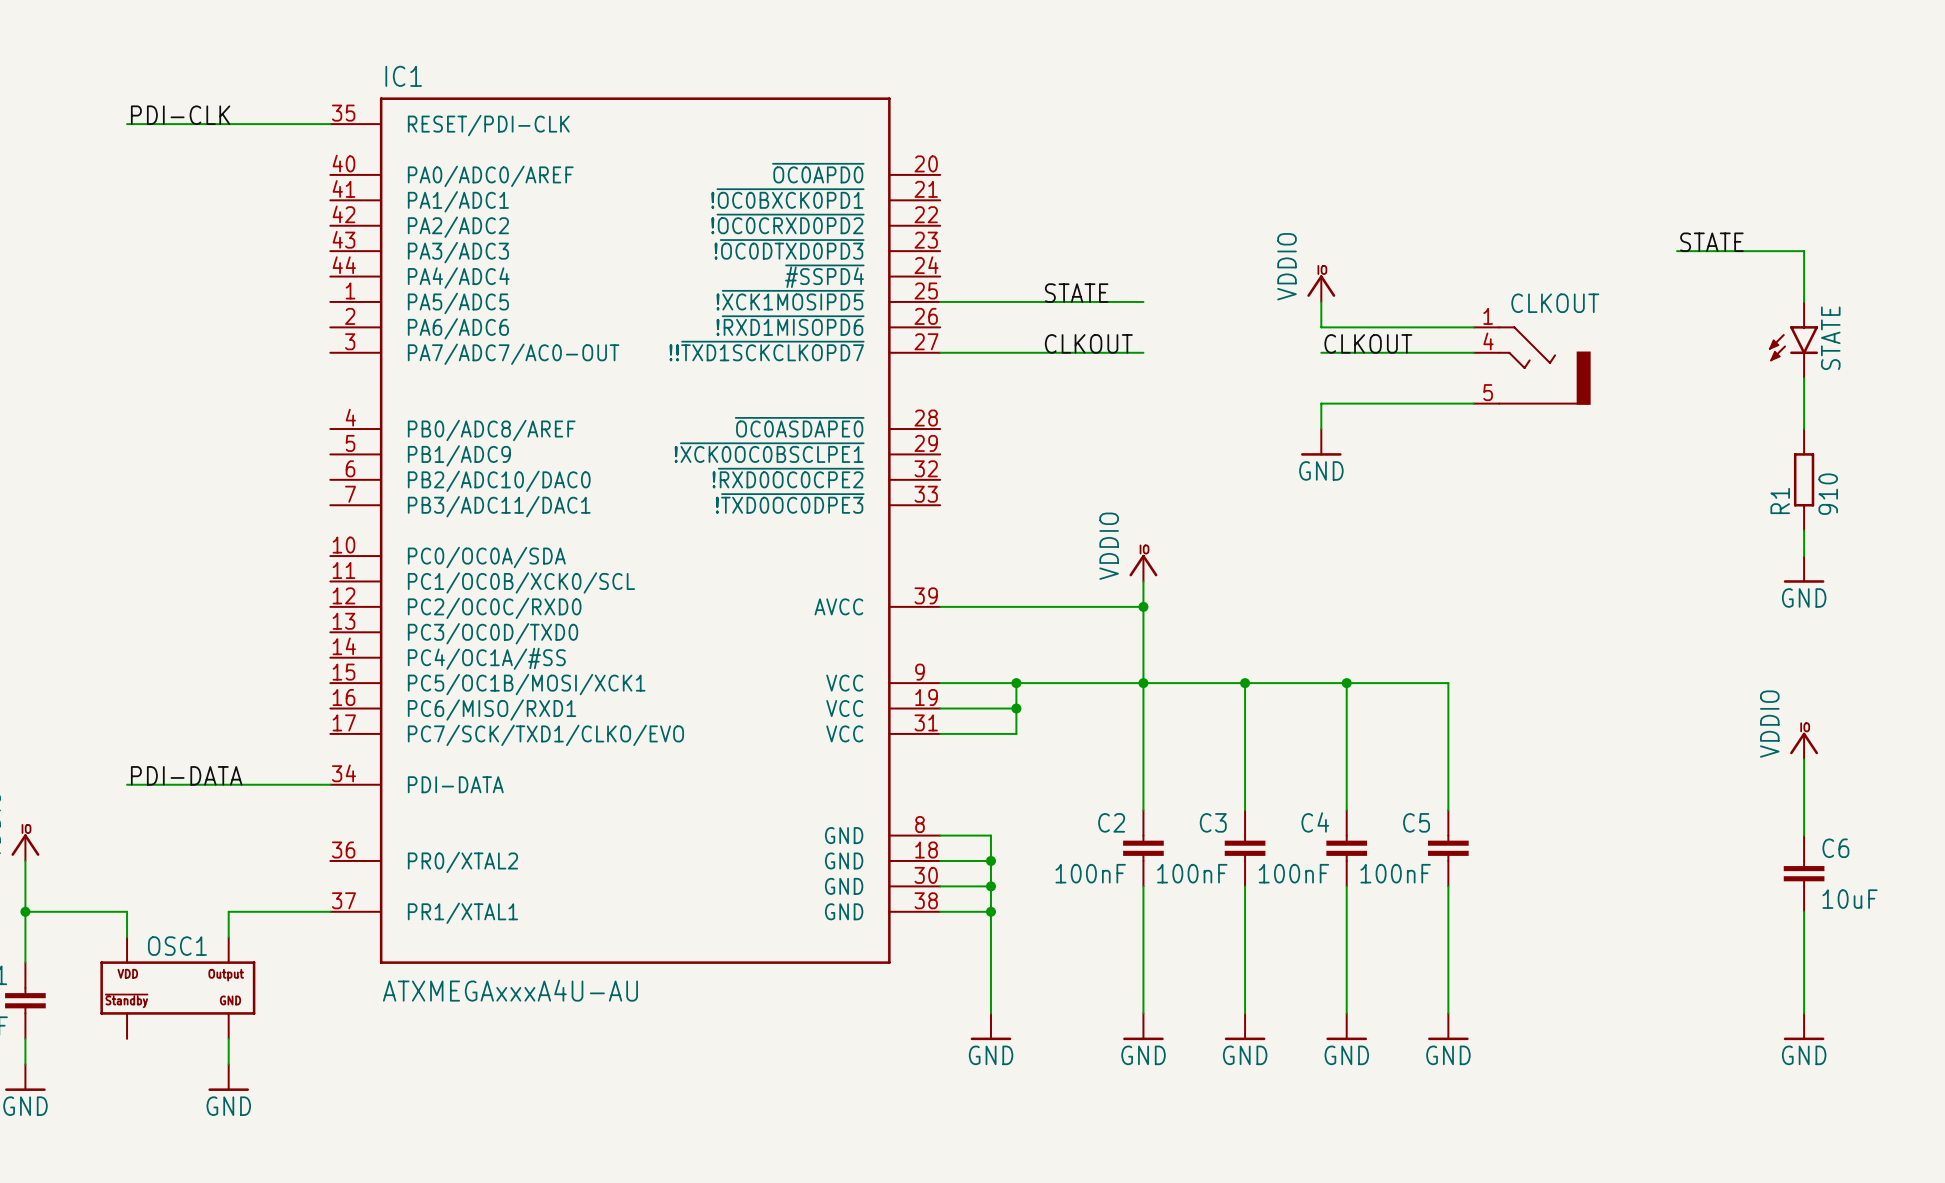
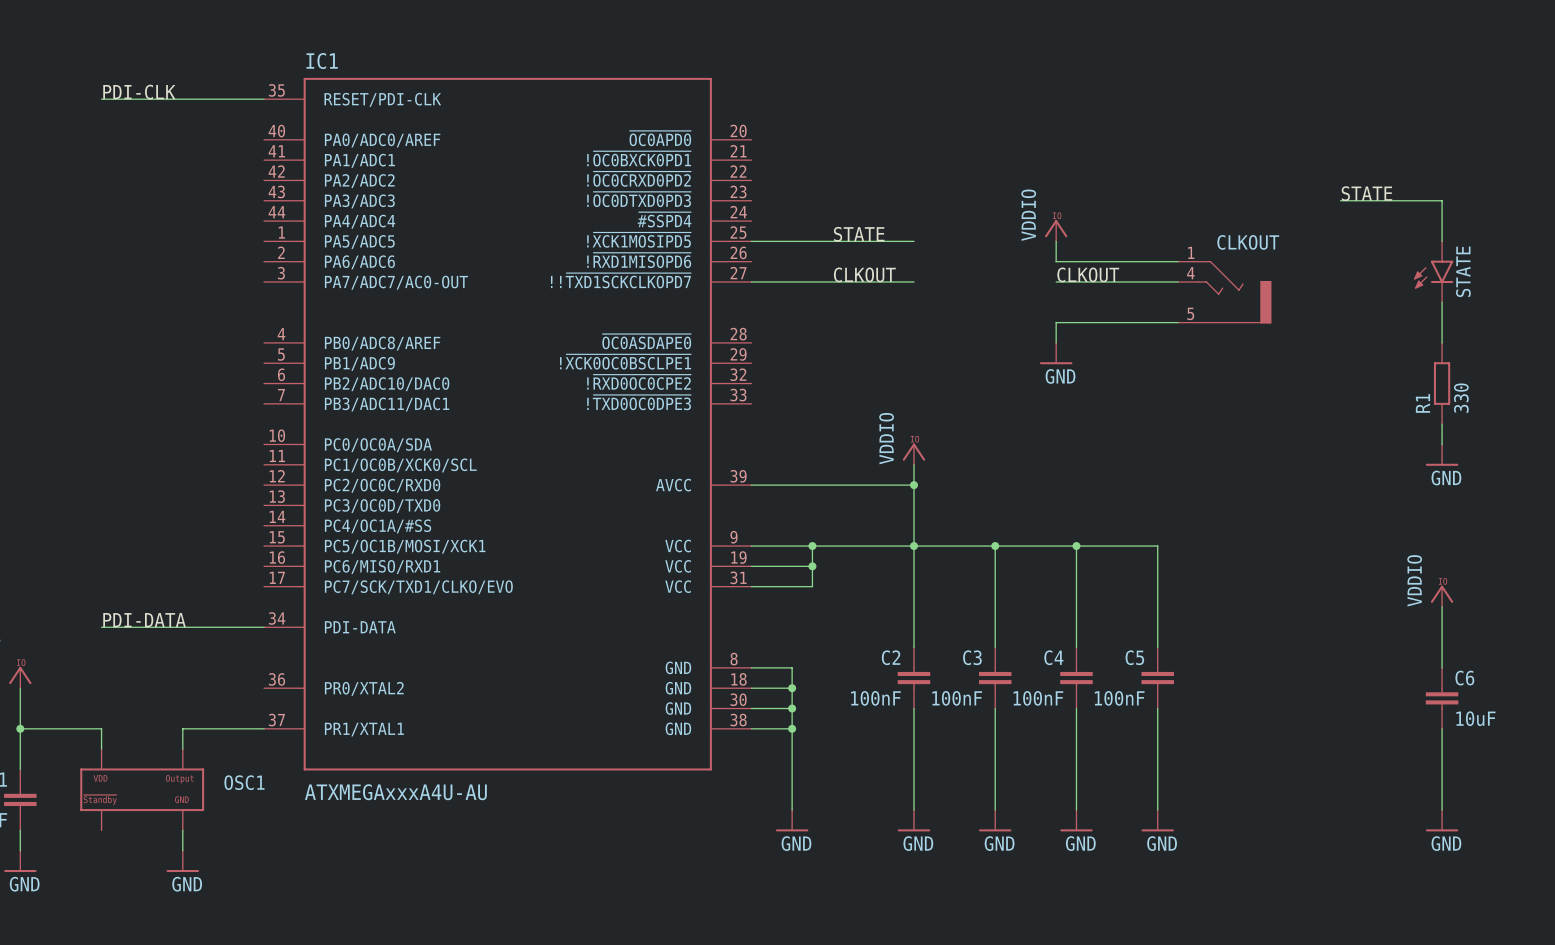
R1 value: 910 (1828, 494) -> 330 (1461, 398)
OSC1 name position: OSC1 (177, 946) -> OSC1 (244, 782)

